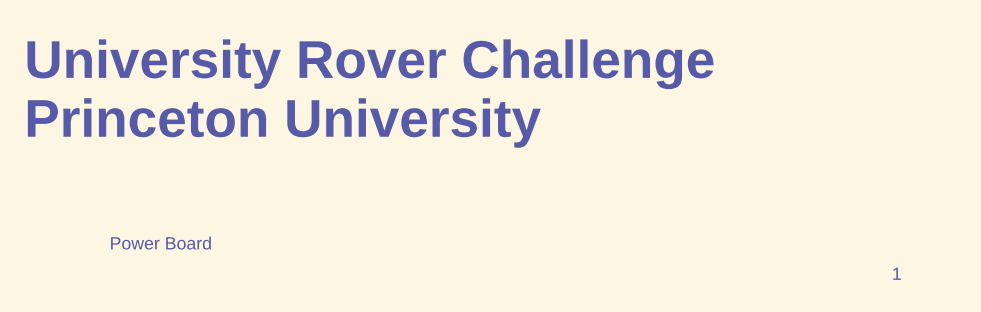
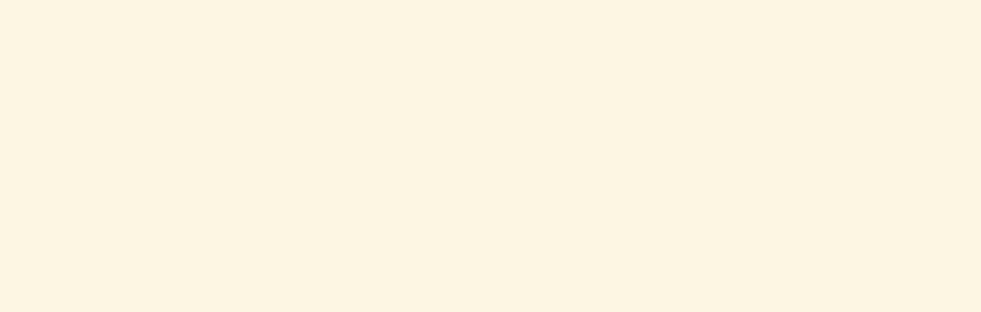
text: University Rover Challenge (370, 64) -> none
text: Princeton University (284, 123) -> none
text: Power Board (160, 243) -> none
text: 1 (897, 273) -> none

